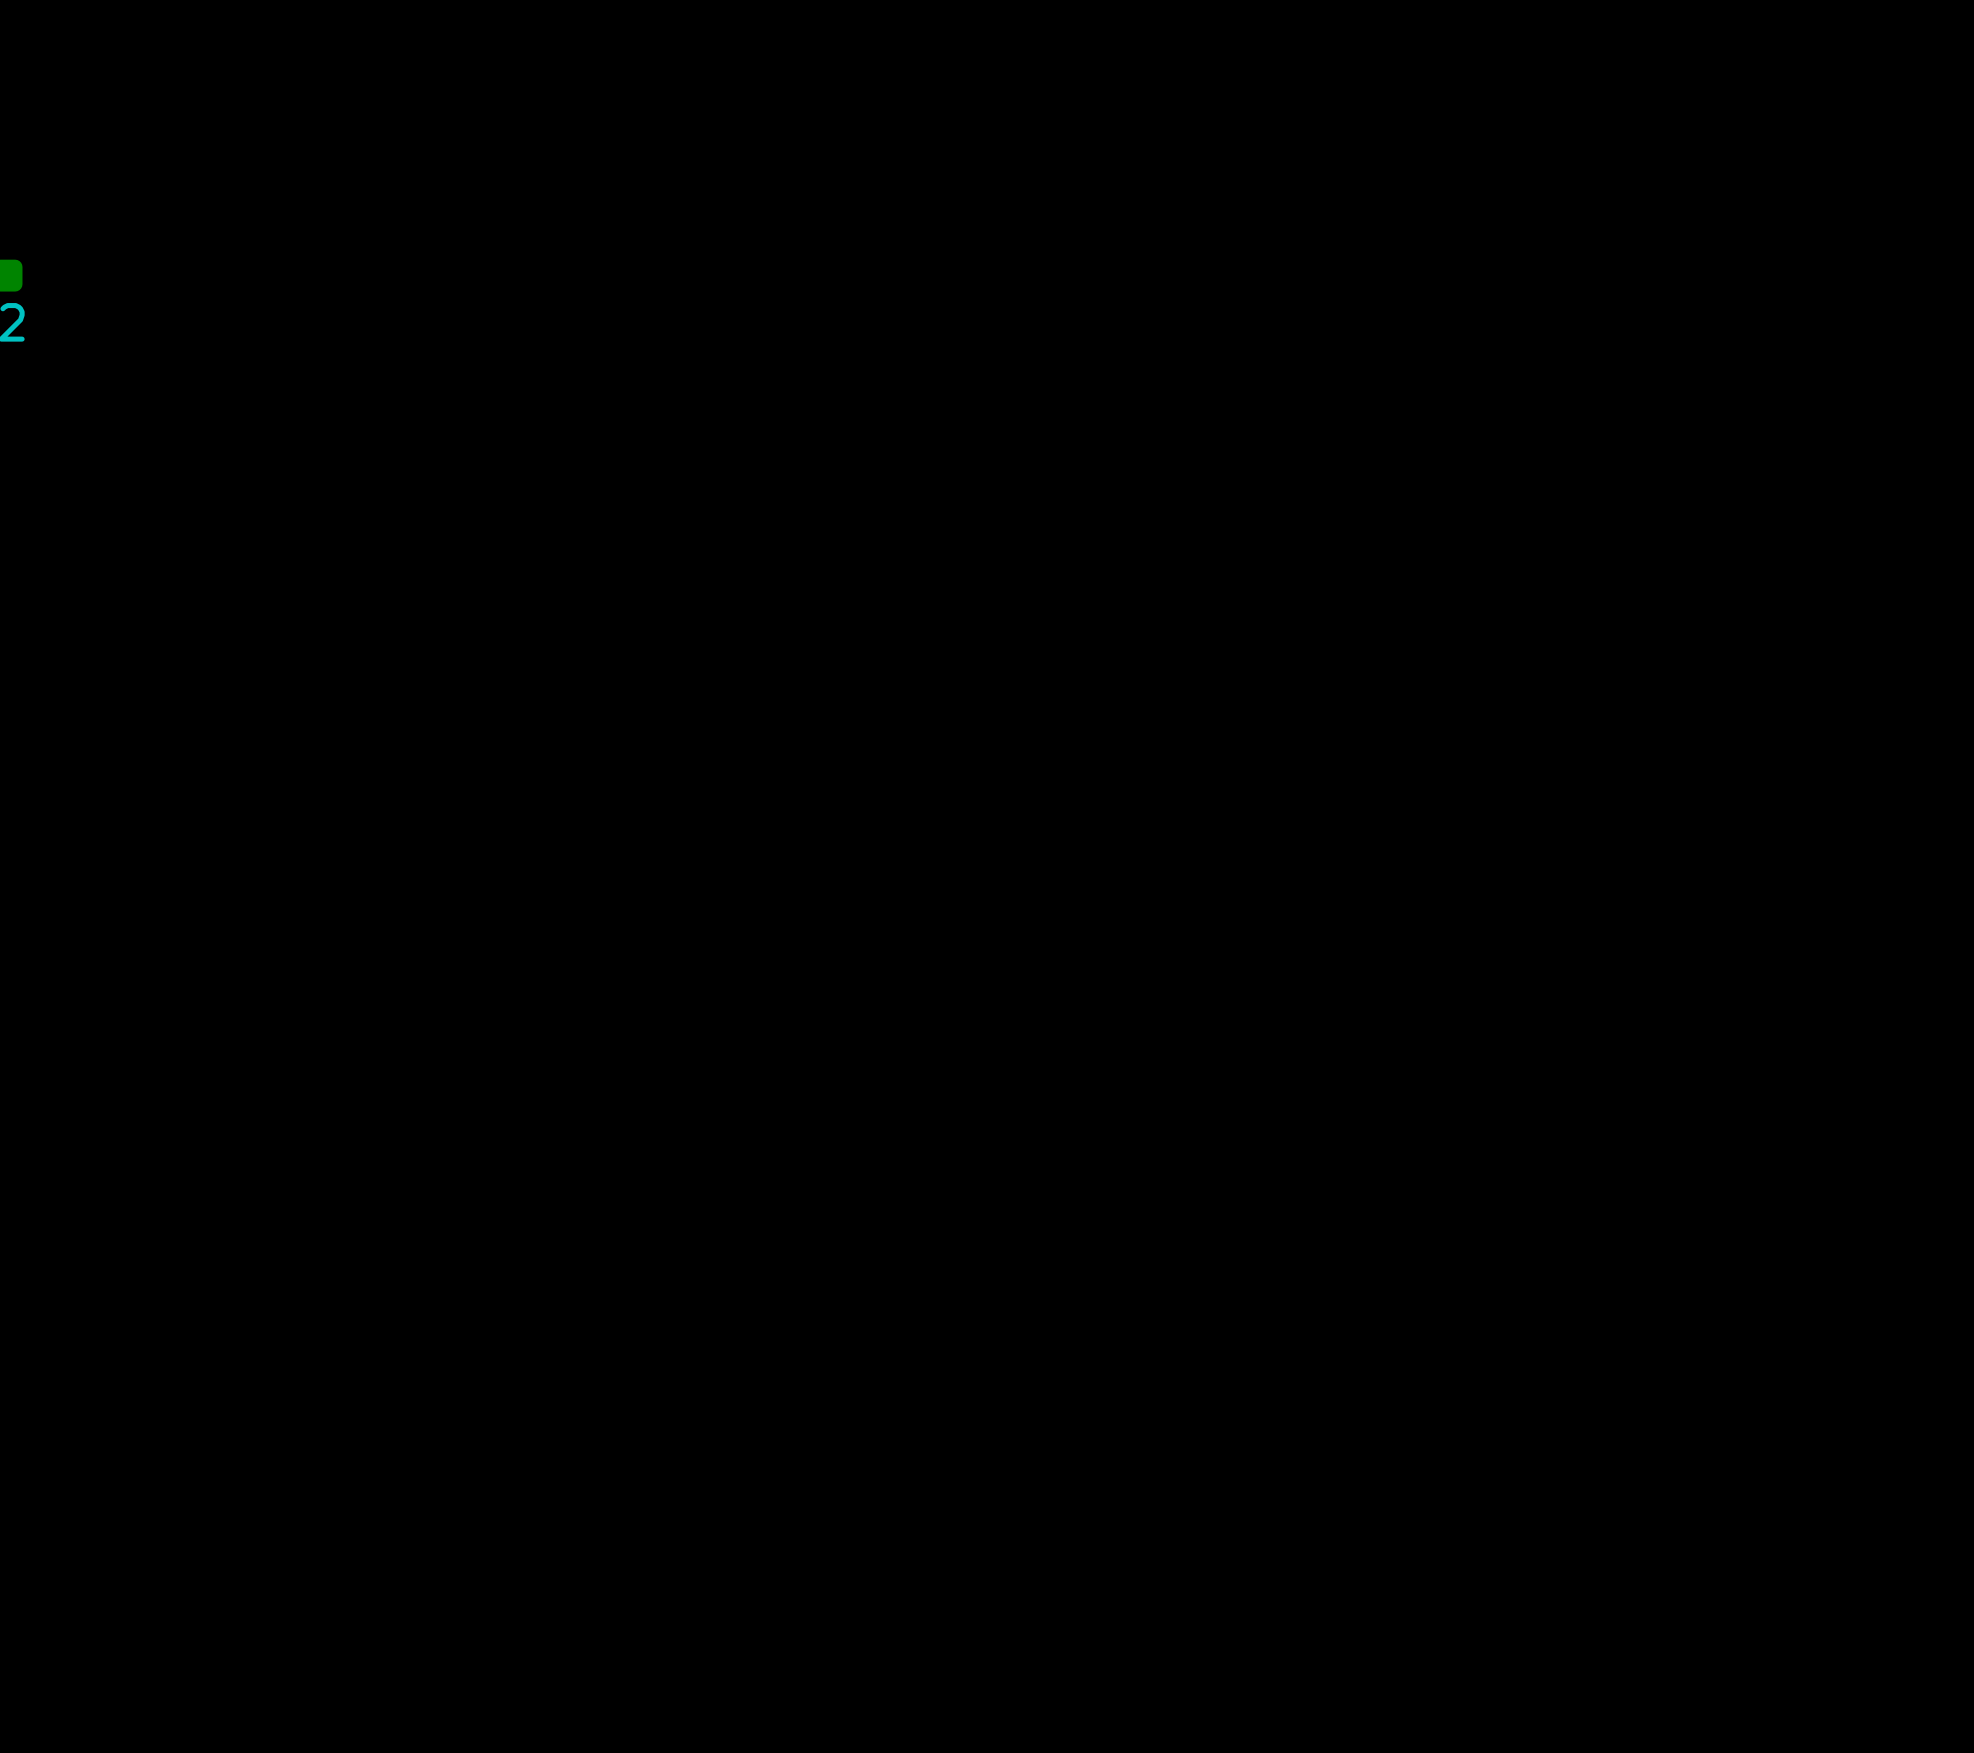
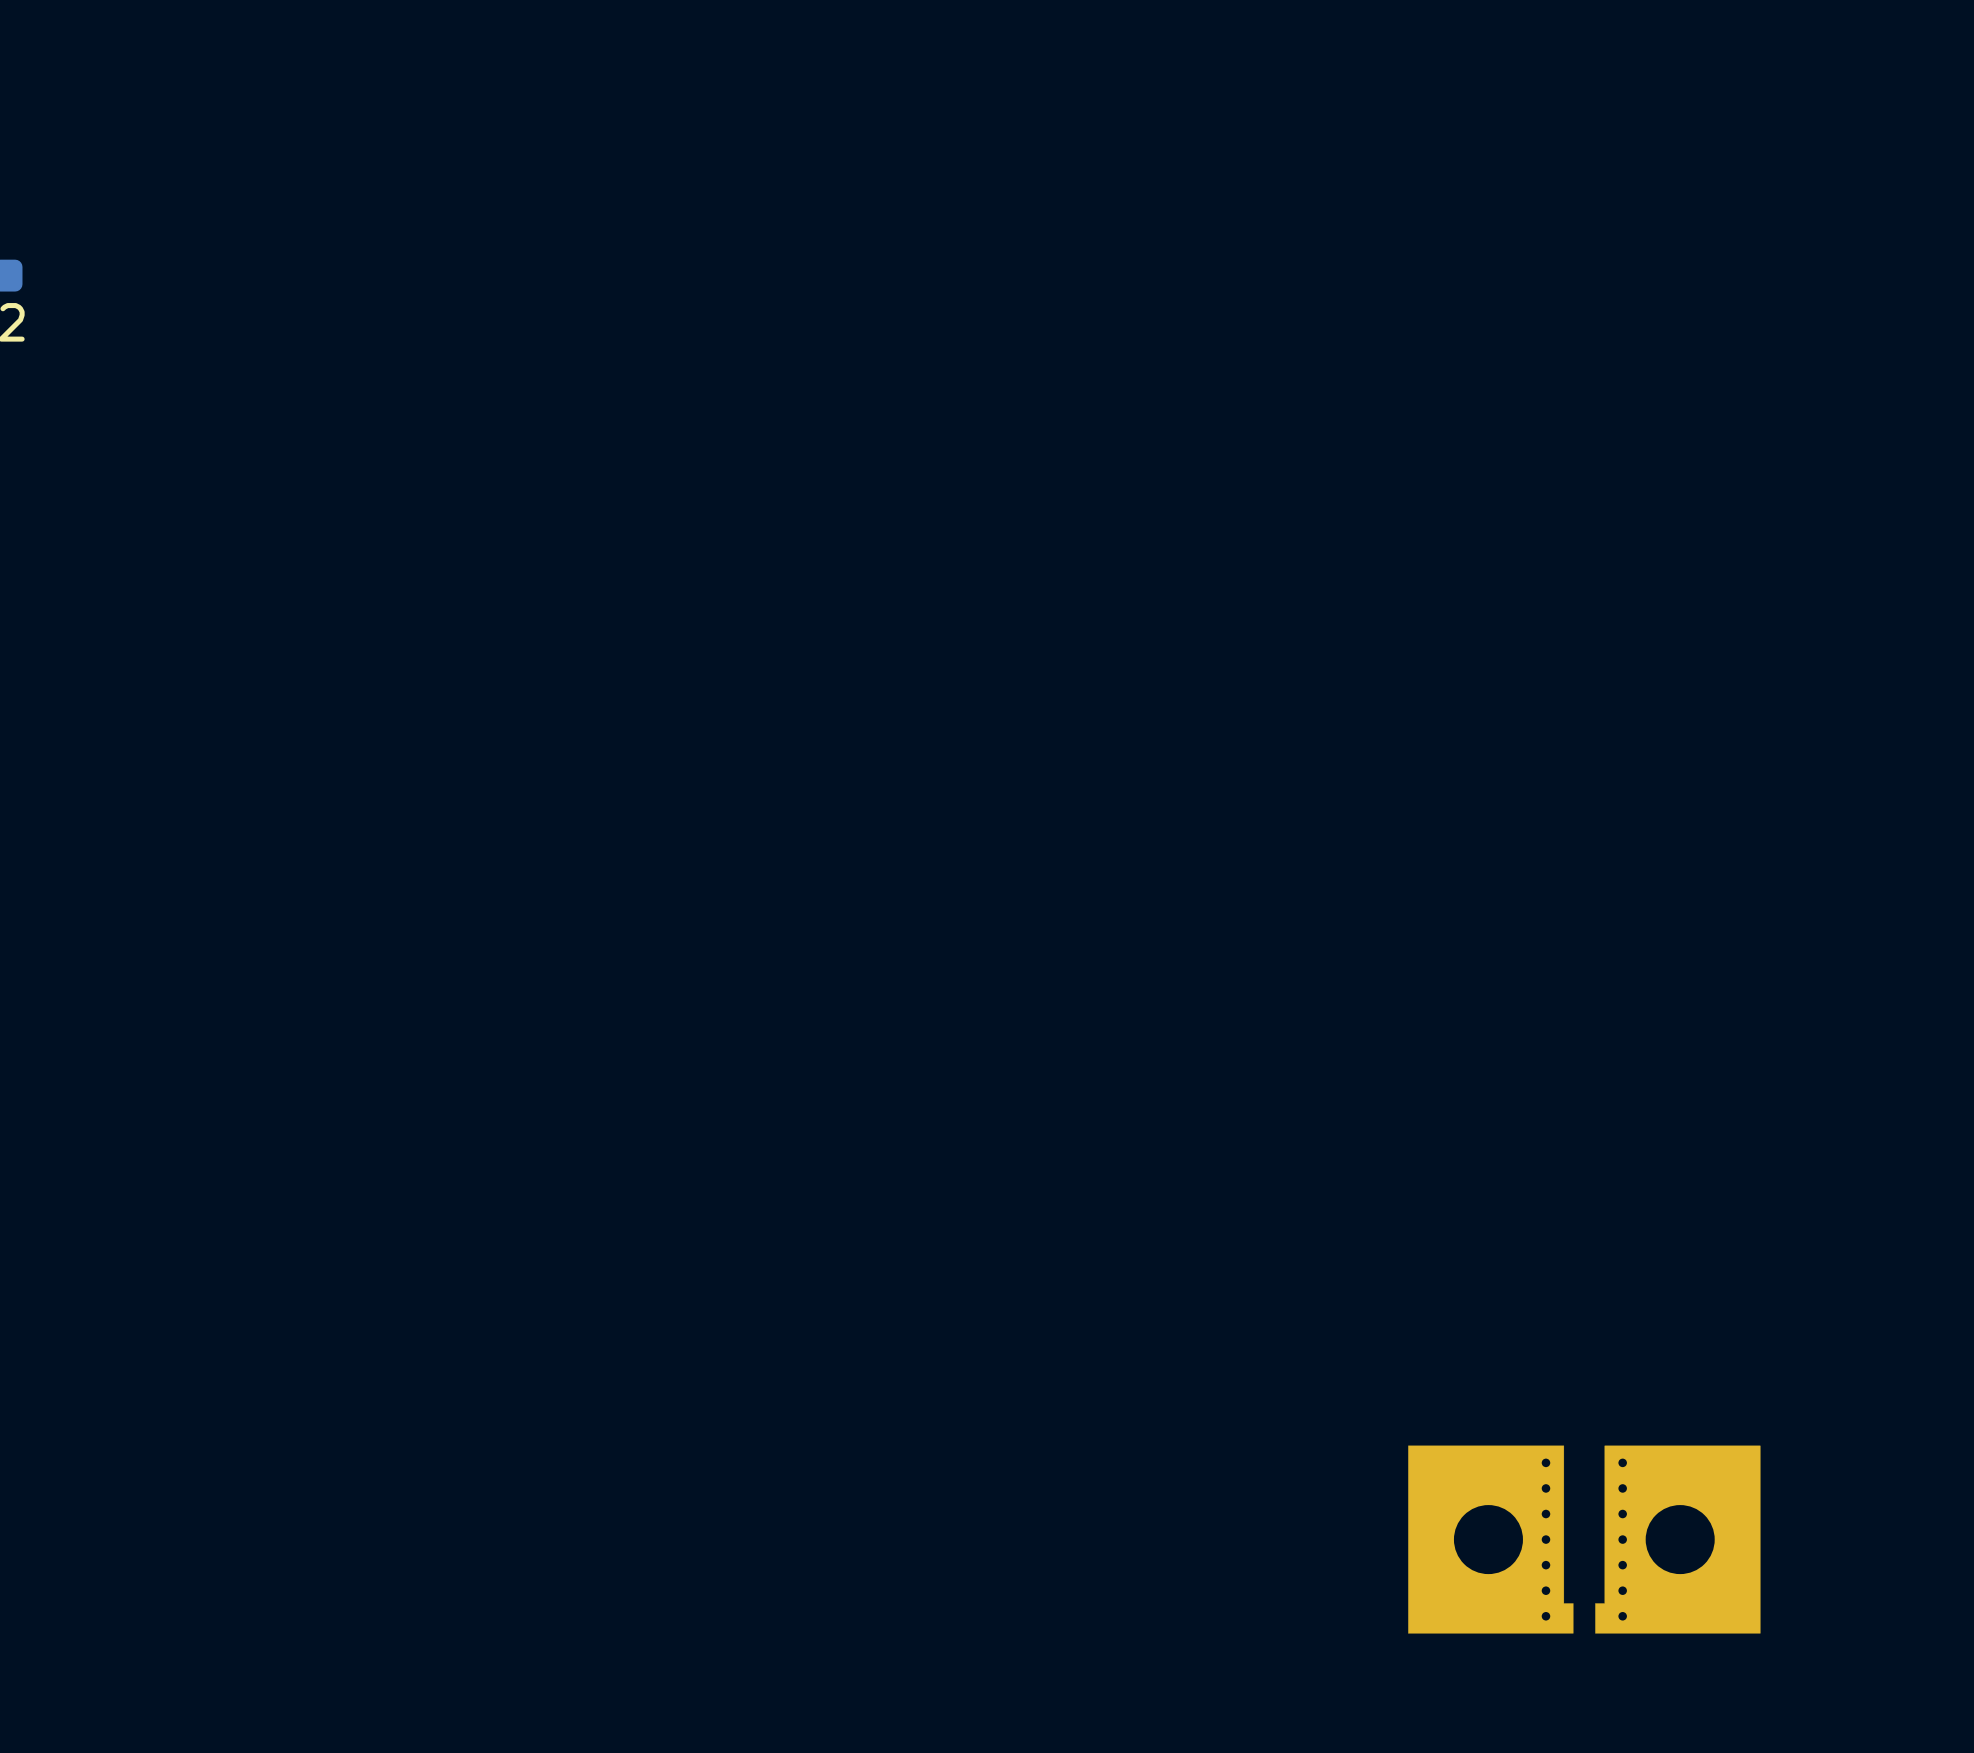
part: none -> (1584, 1539)

